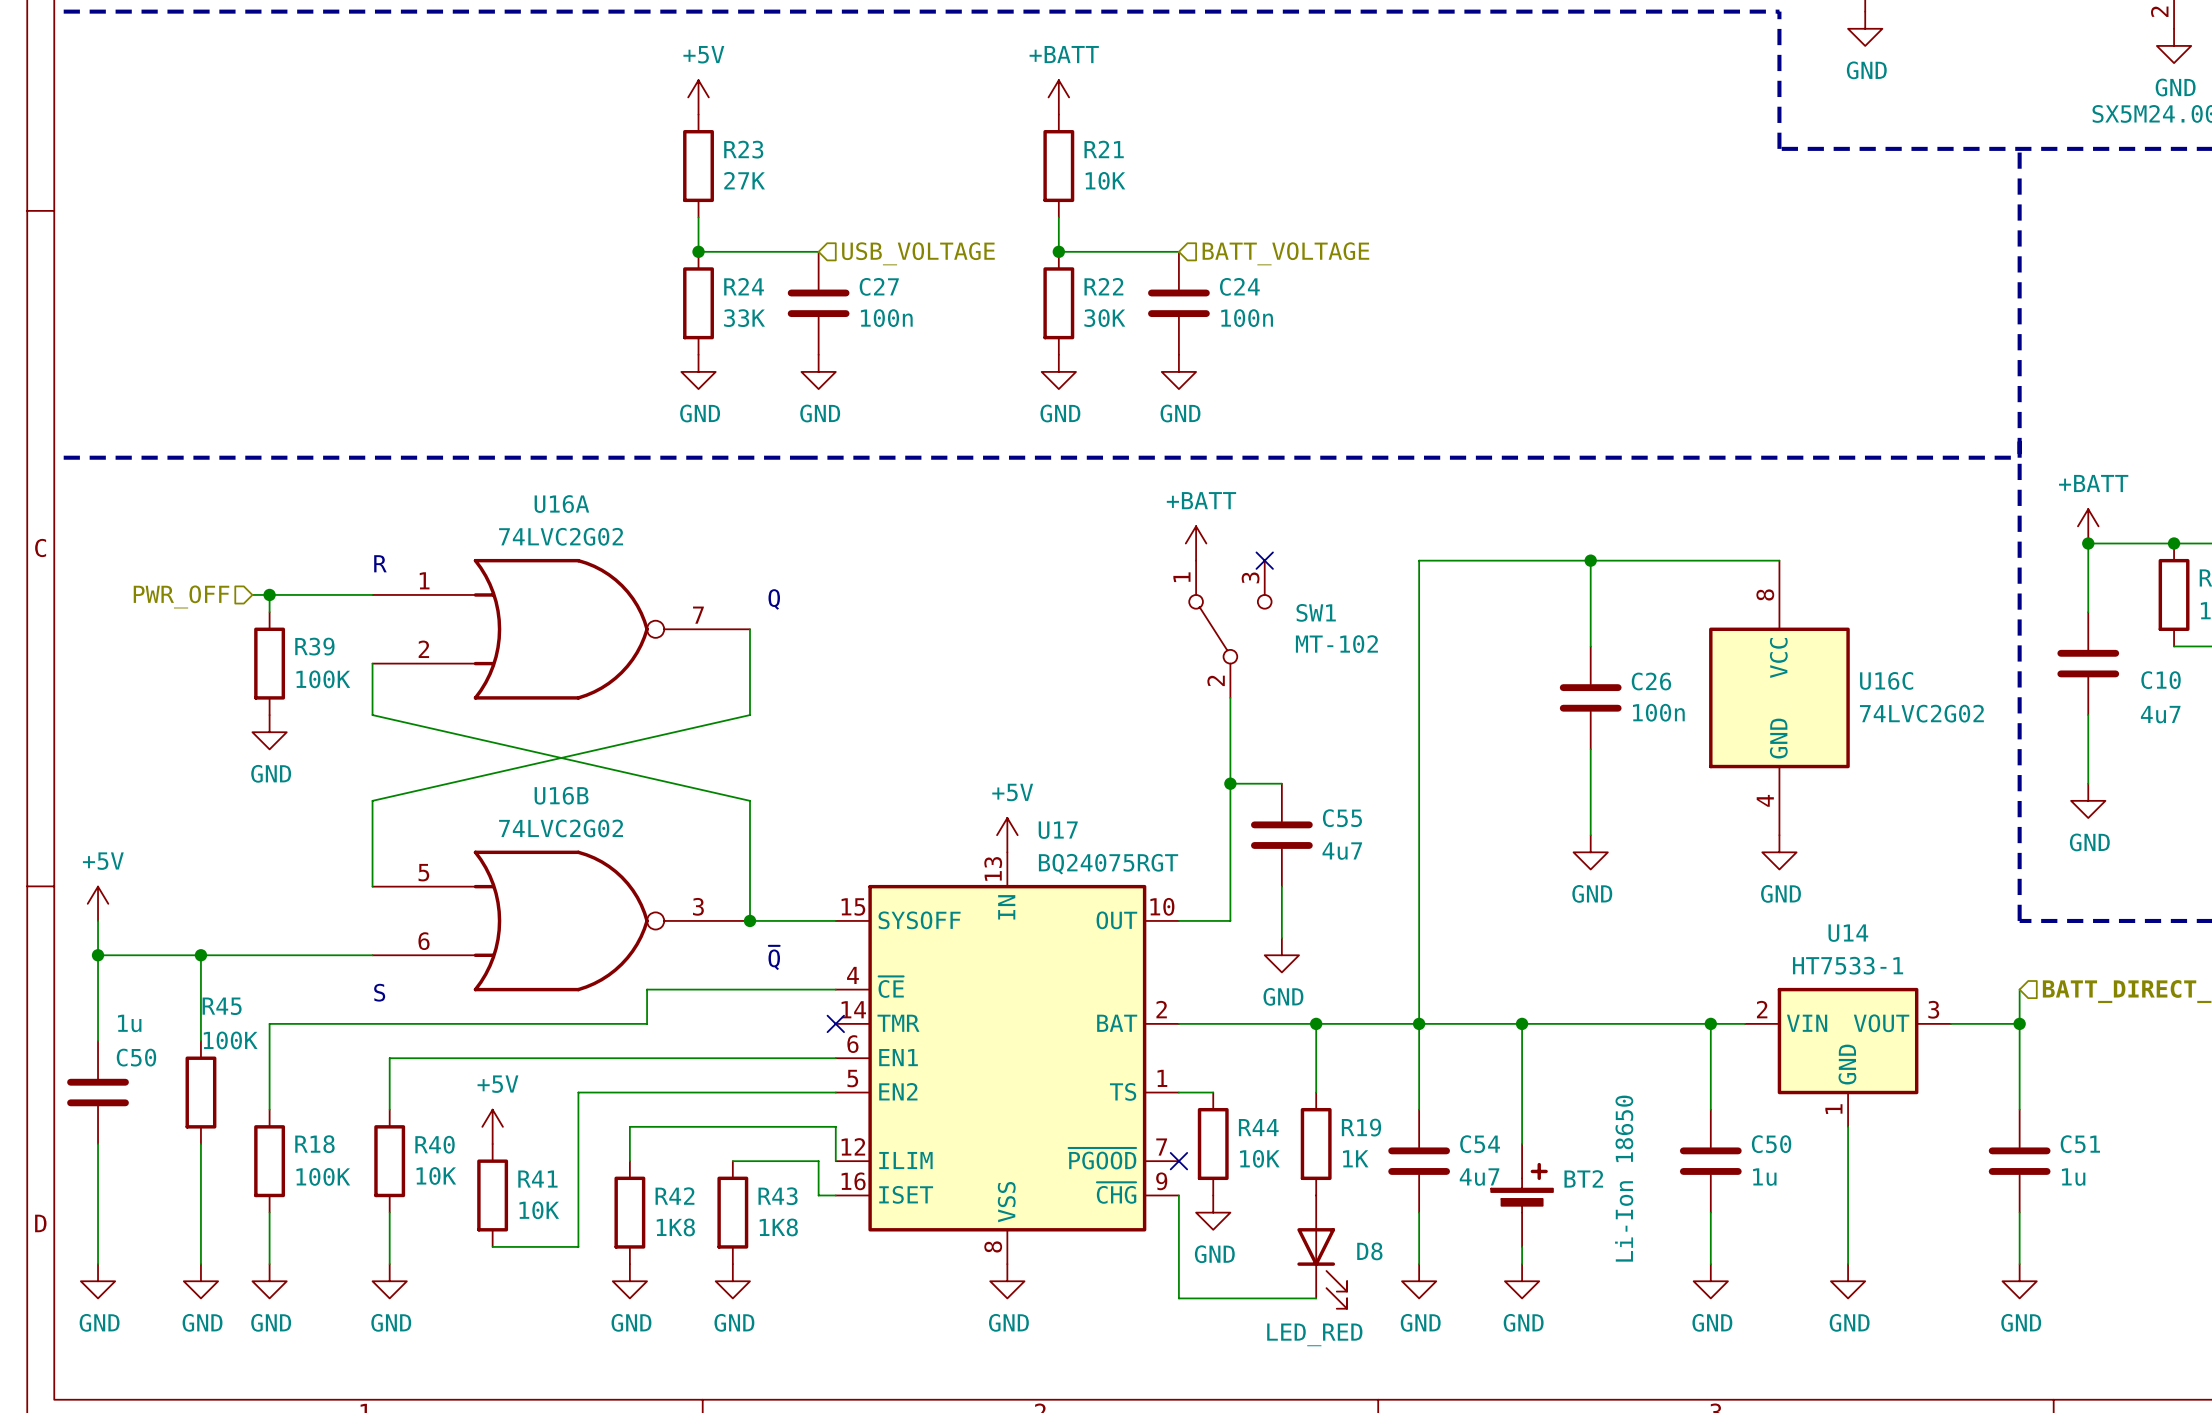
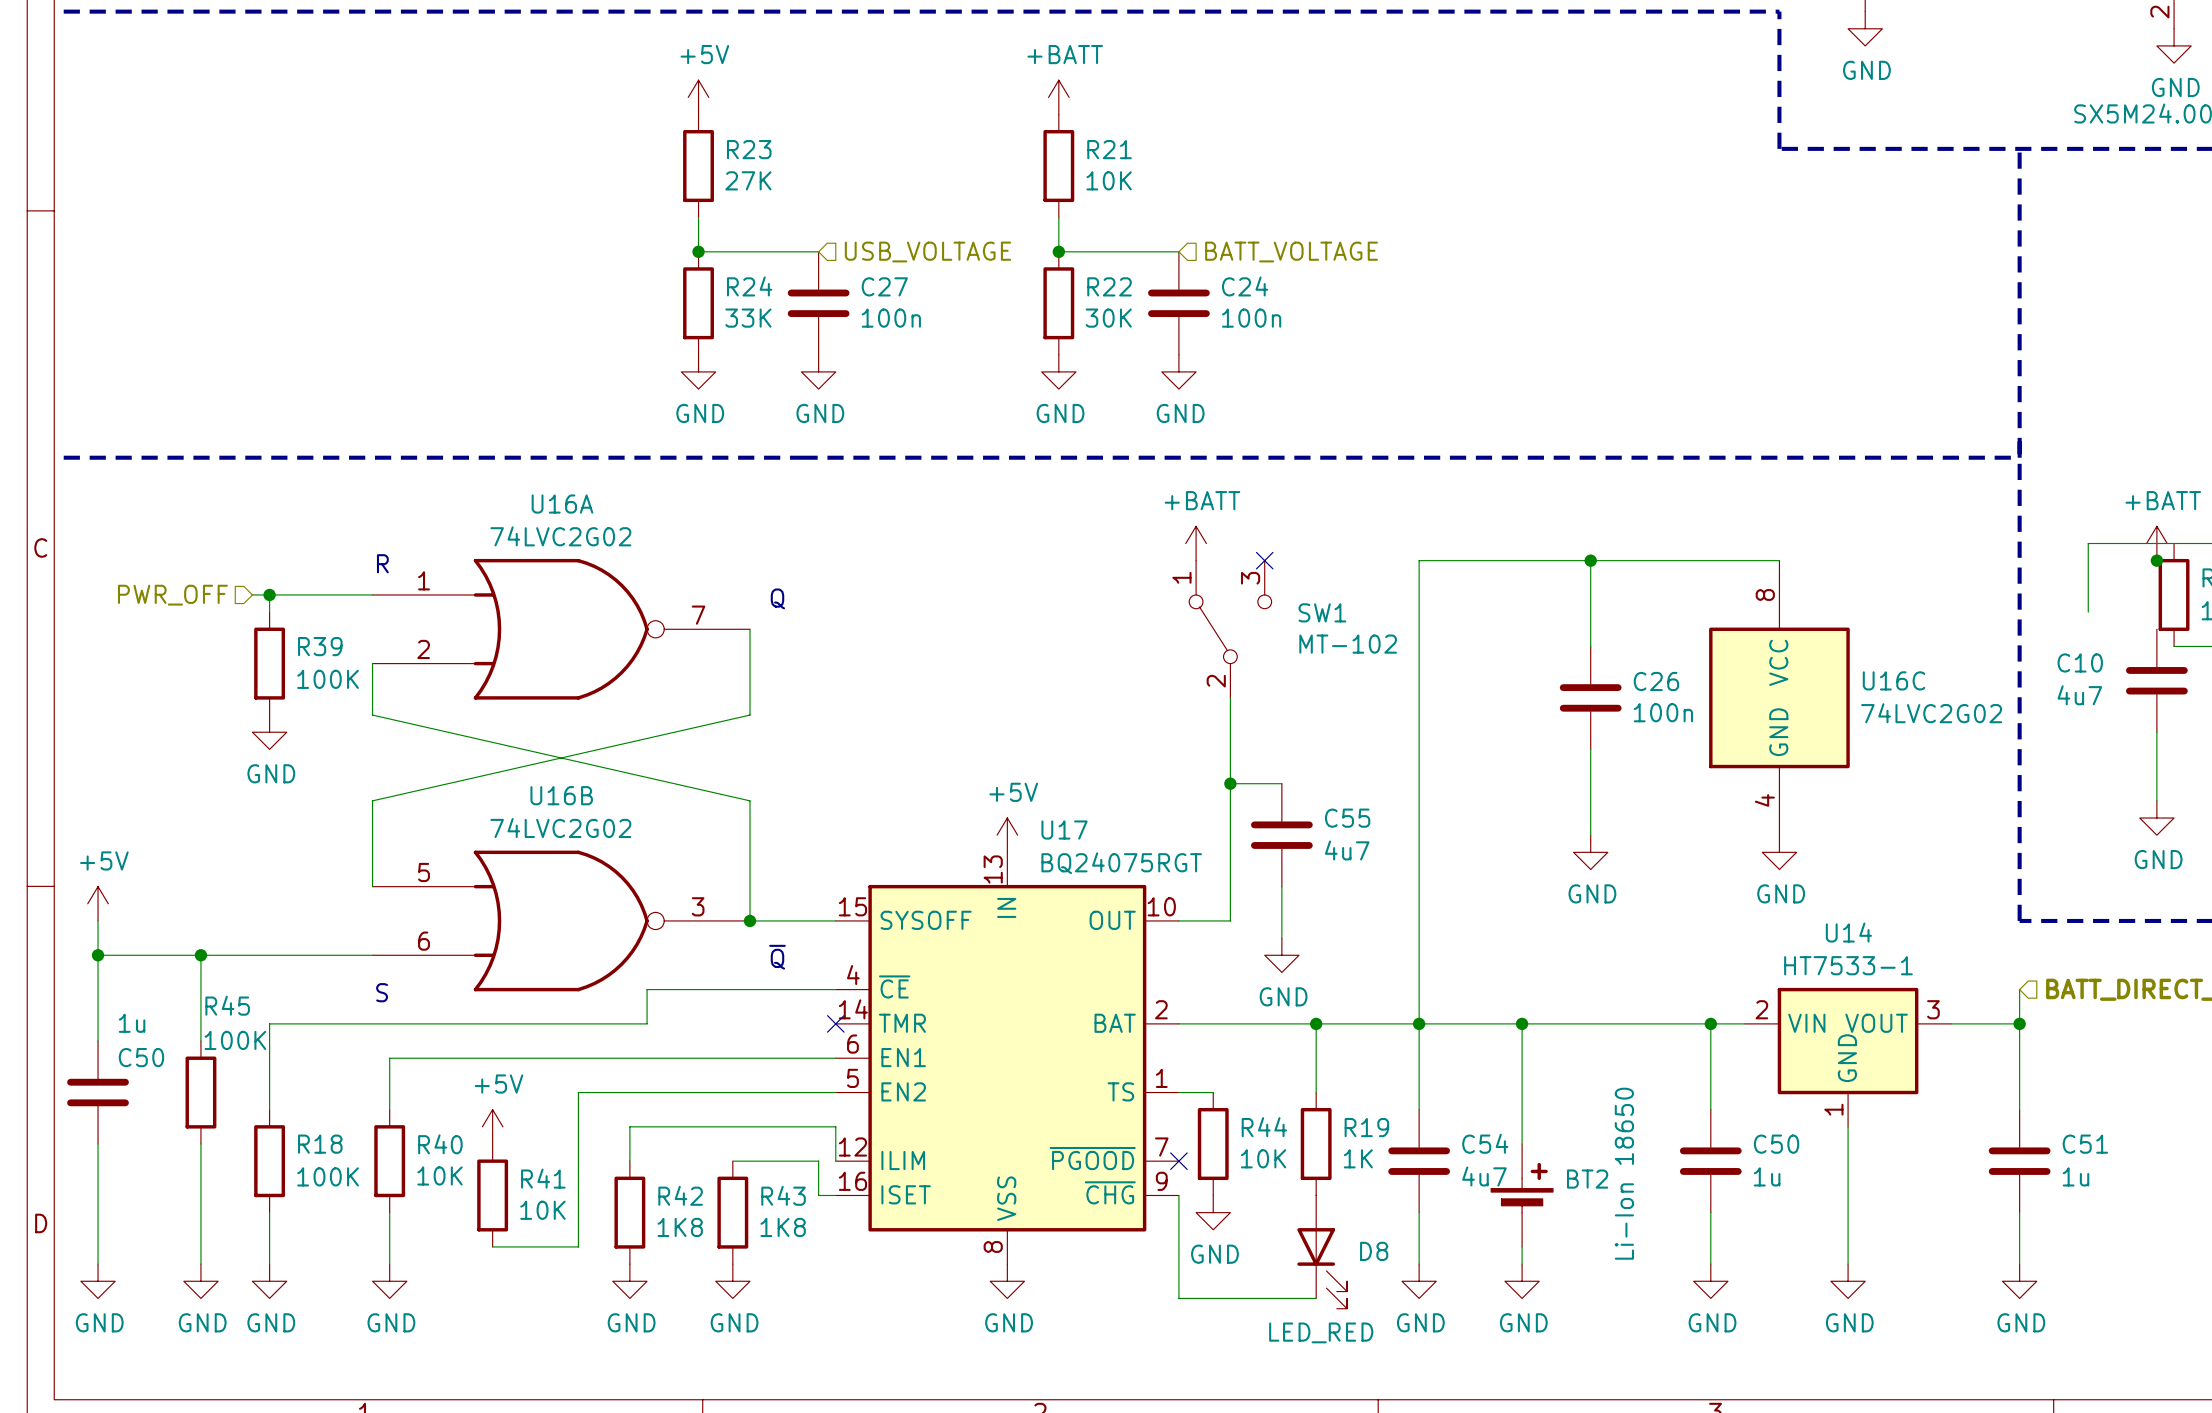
power symbol position: +BATT (2088, 526) -> +BATT (2156, 543)
junction: (2088, 543) -> none
junction position: (2174, 543) -> (2156, 560)
C10 position: (2088, 663) -> (2156, 680)
C10 name position: C10 (2161, 680) -> C10 (2080, 662)
C10 value position: 4u7 (2160, 714) -> 4u7 (2079, 695)
wire: (2088, 715) (2088, 783) -> (2156, 732) (2156, 800)
power symbol position: GND (2088, 800) -> GND (2156, 818)

